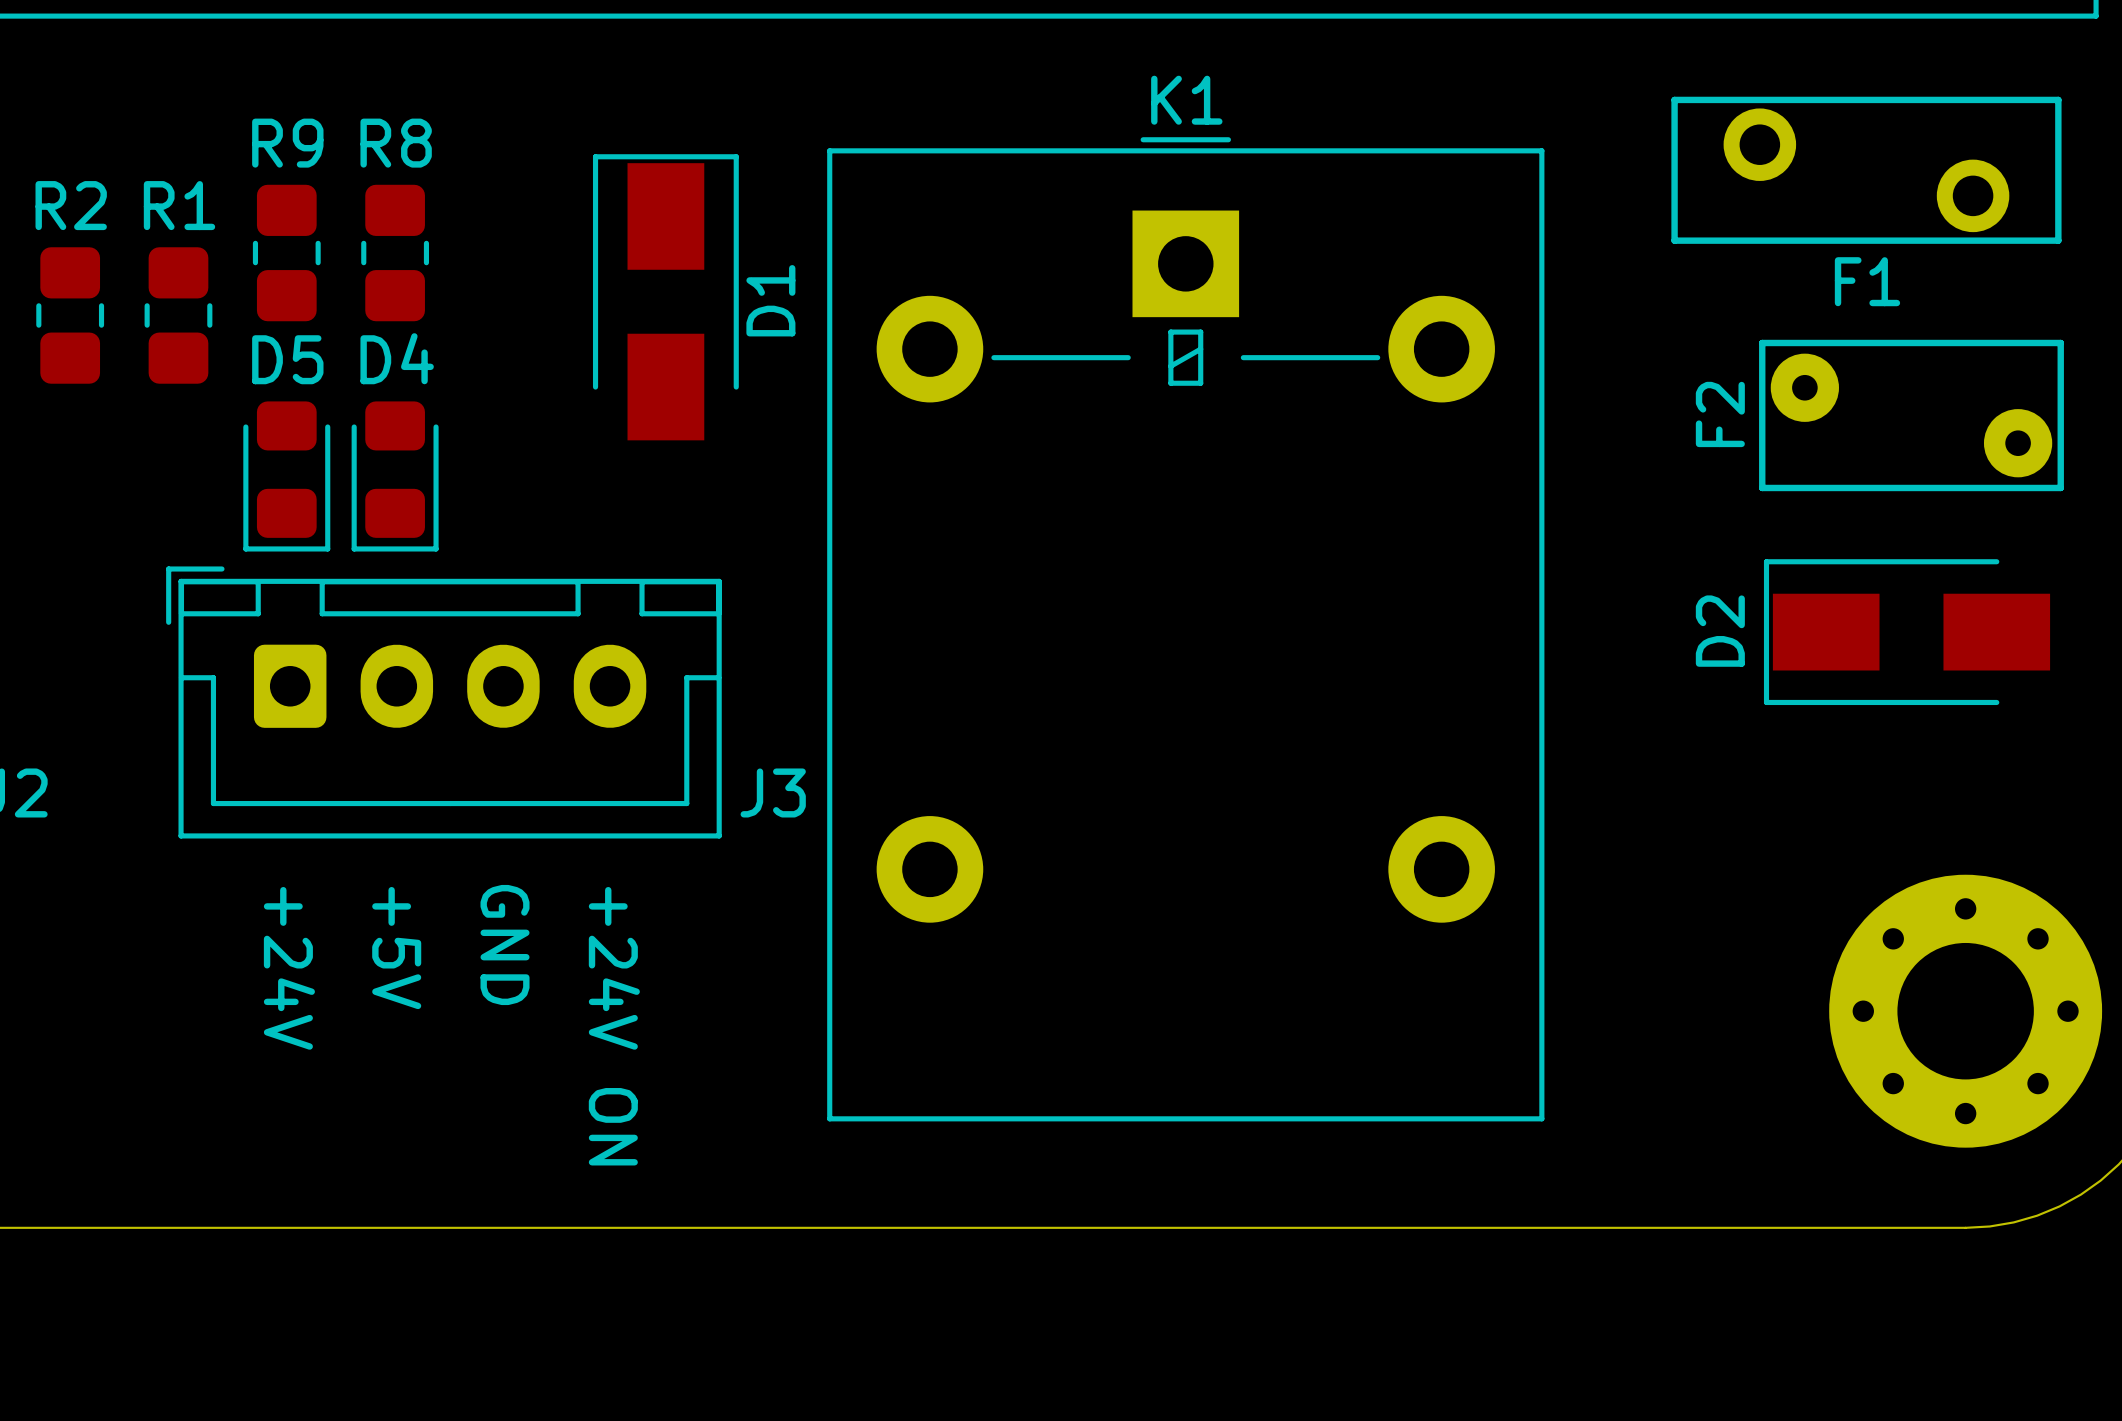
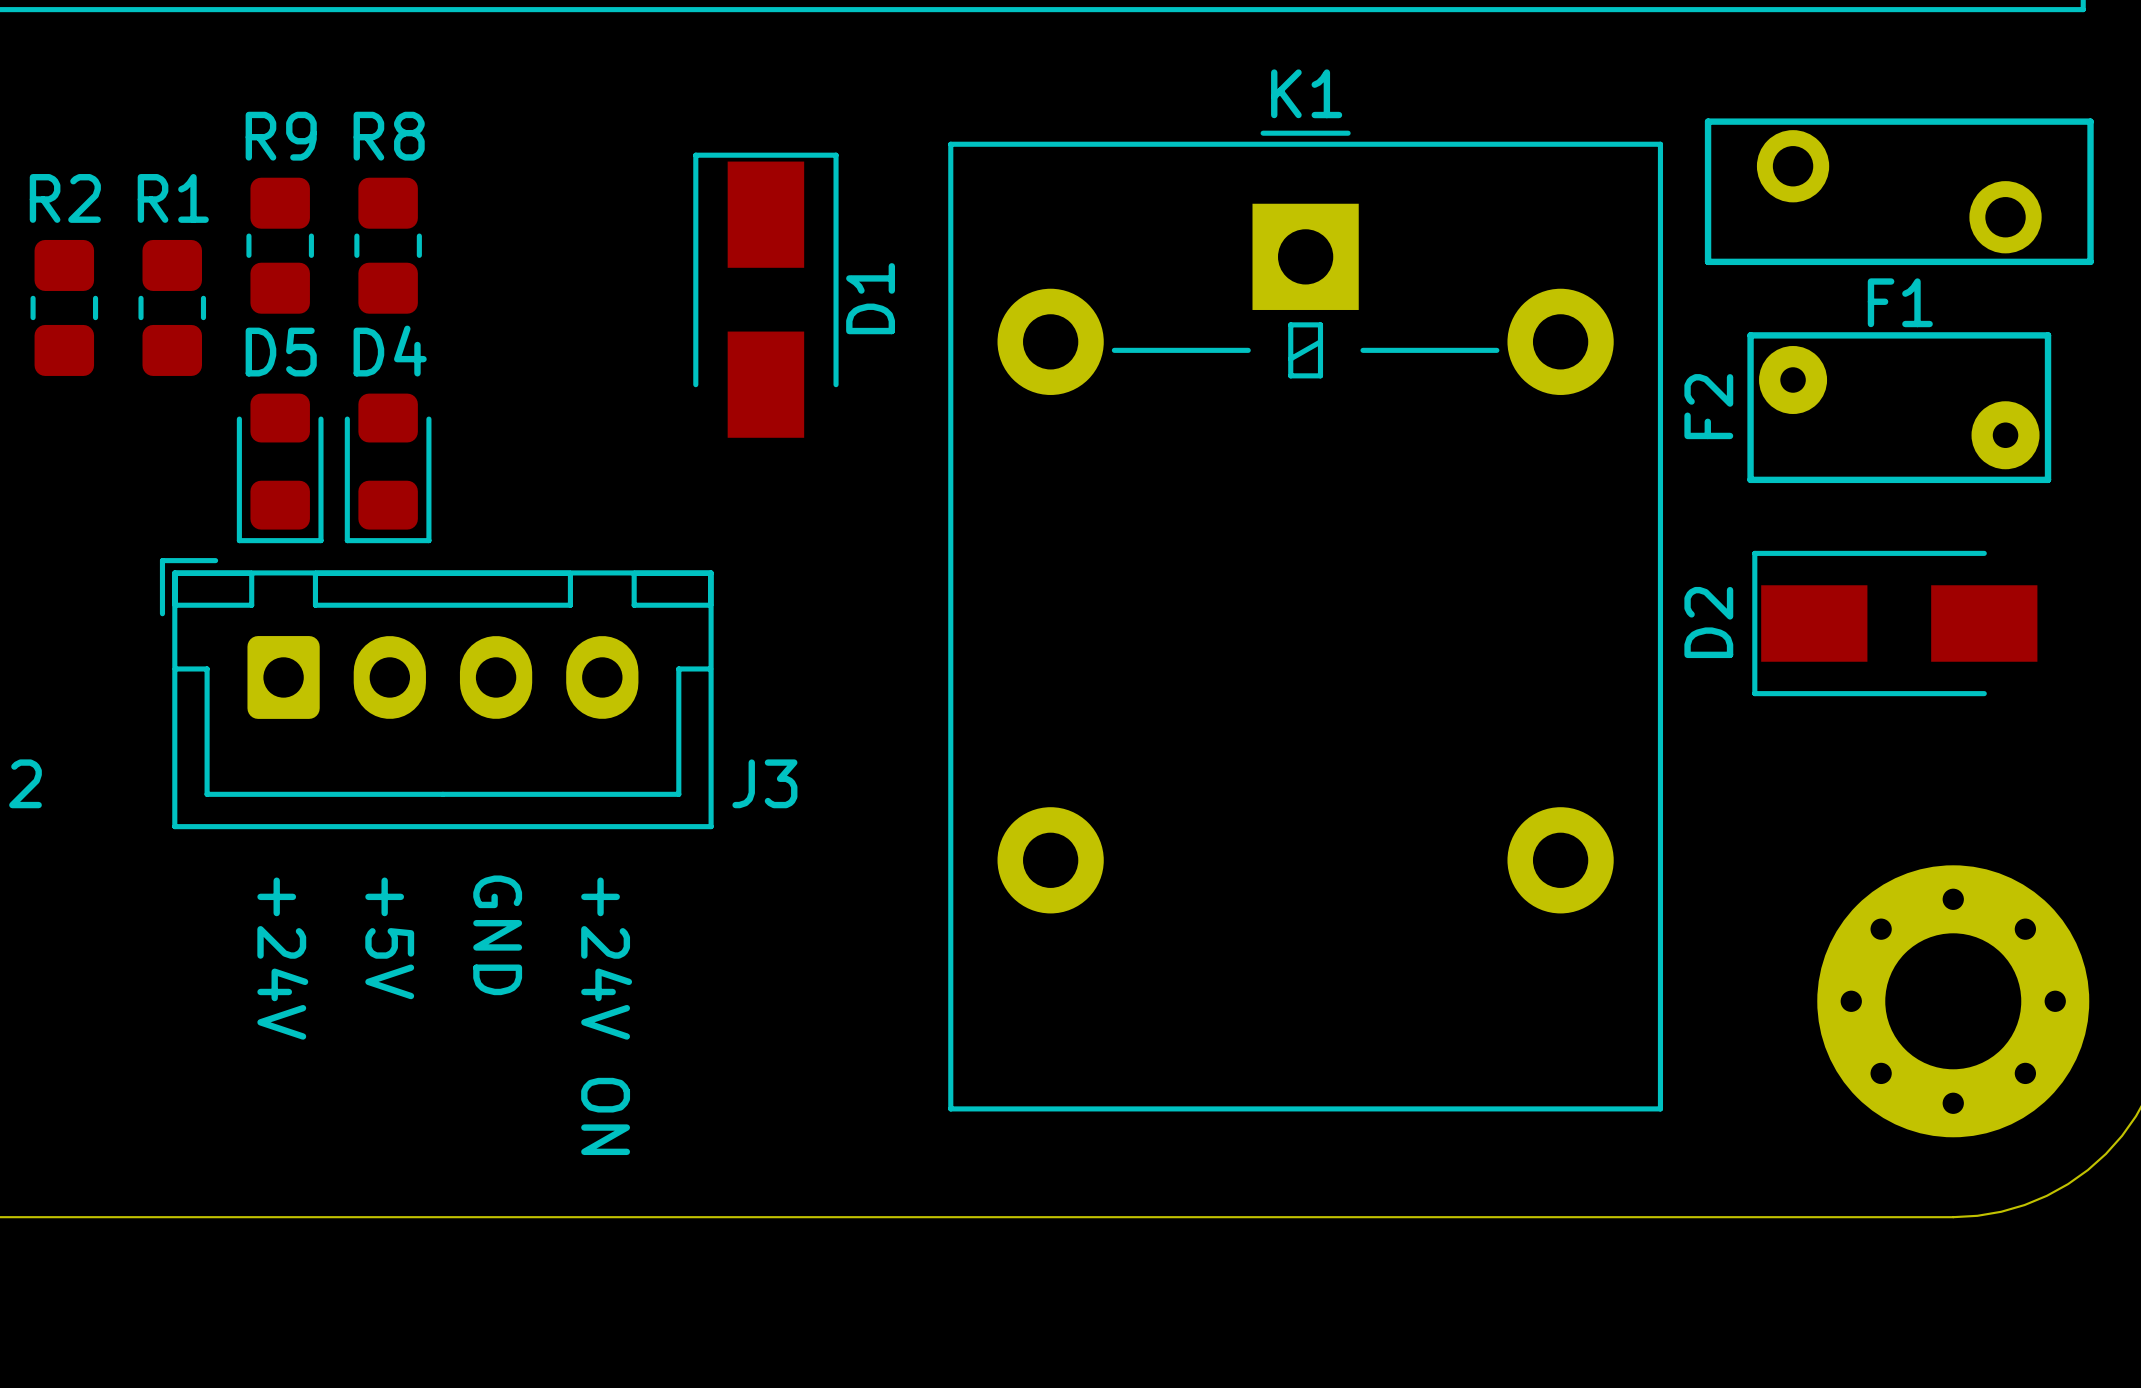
F1 position: (1866, 170) -> (1899, 191)
D1 position: (665, 297) -> (765, 295)
K1 position: (1185, 629) -> (1305, 621)

